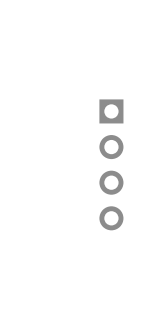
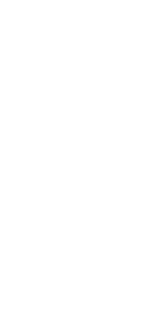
part: (111, 164) -> none

